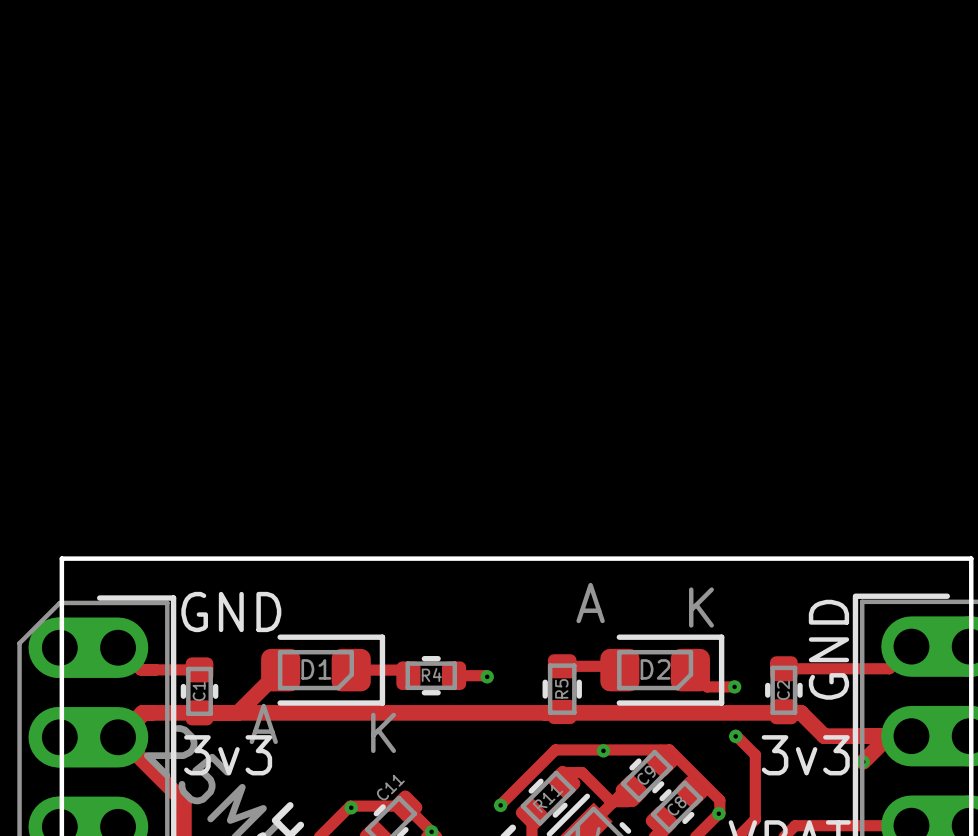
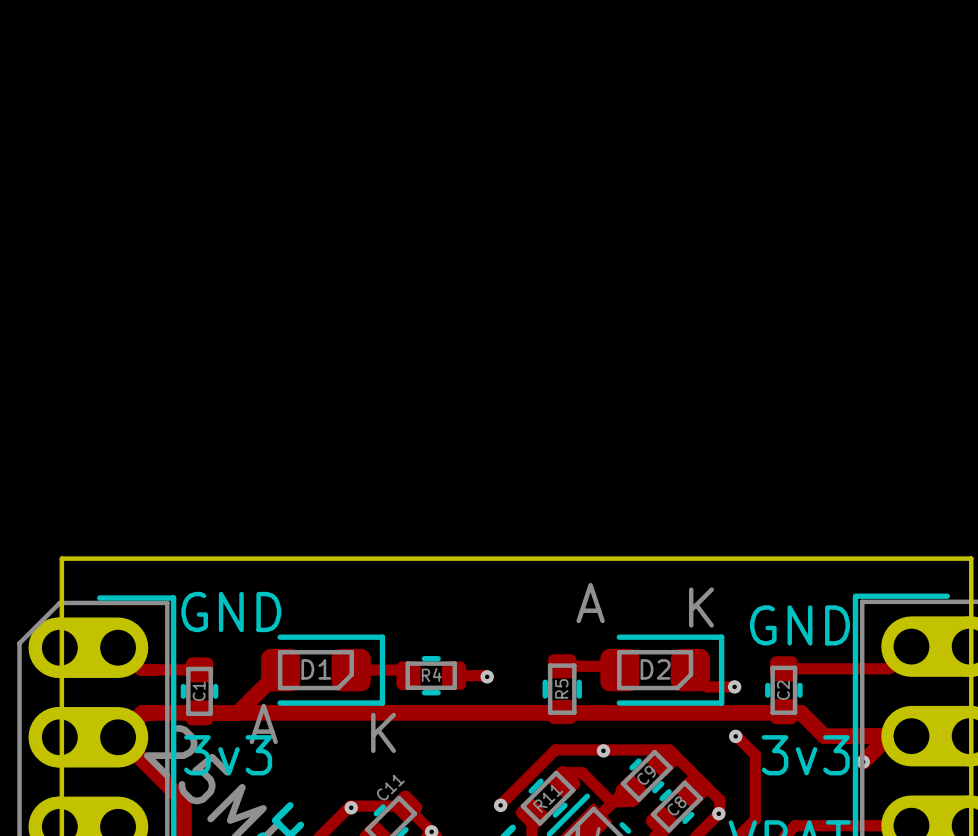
text rotation: 0° (828, 649) -> 90° clockwise (799, 625)

